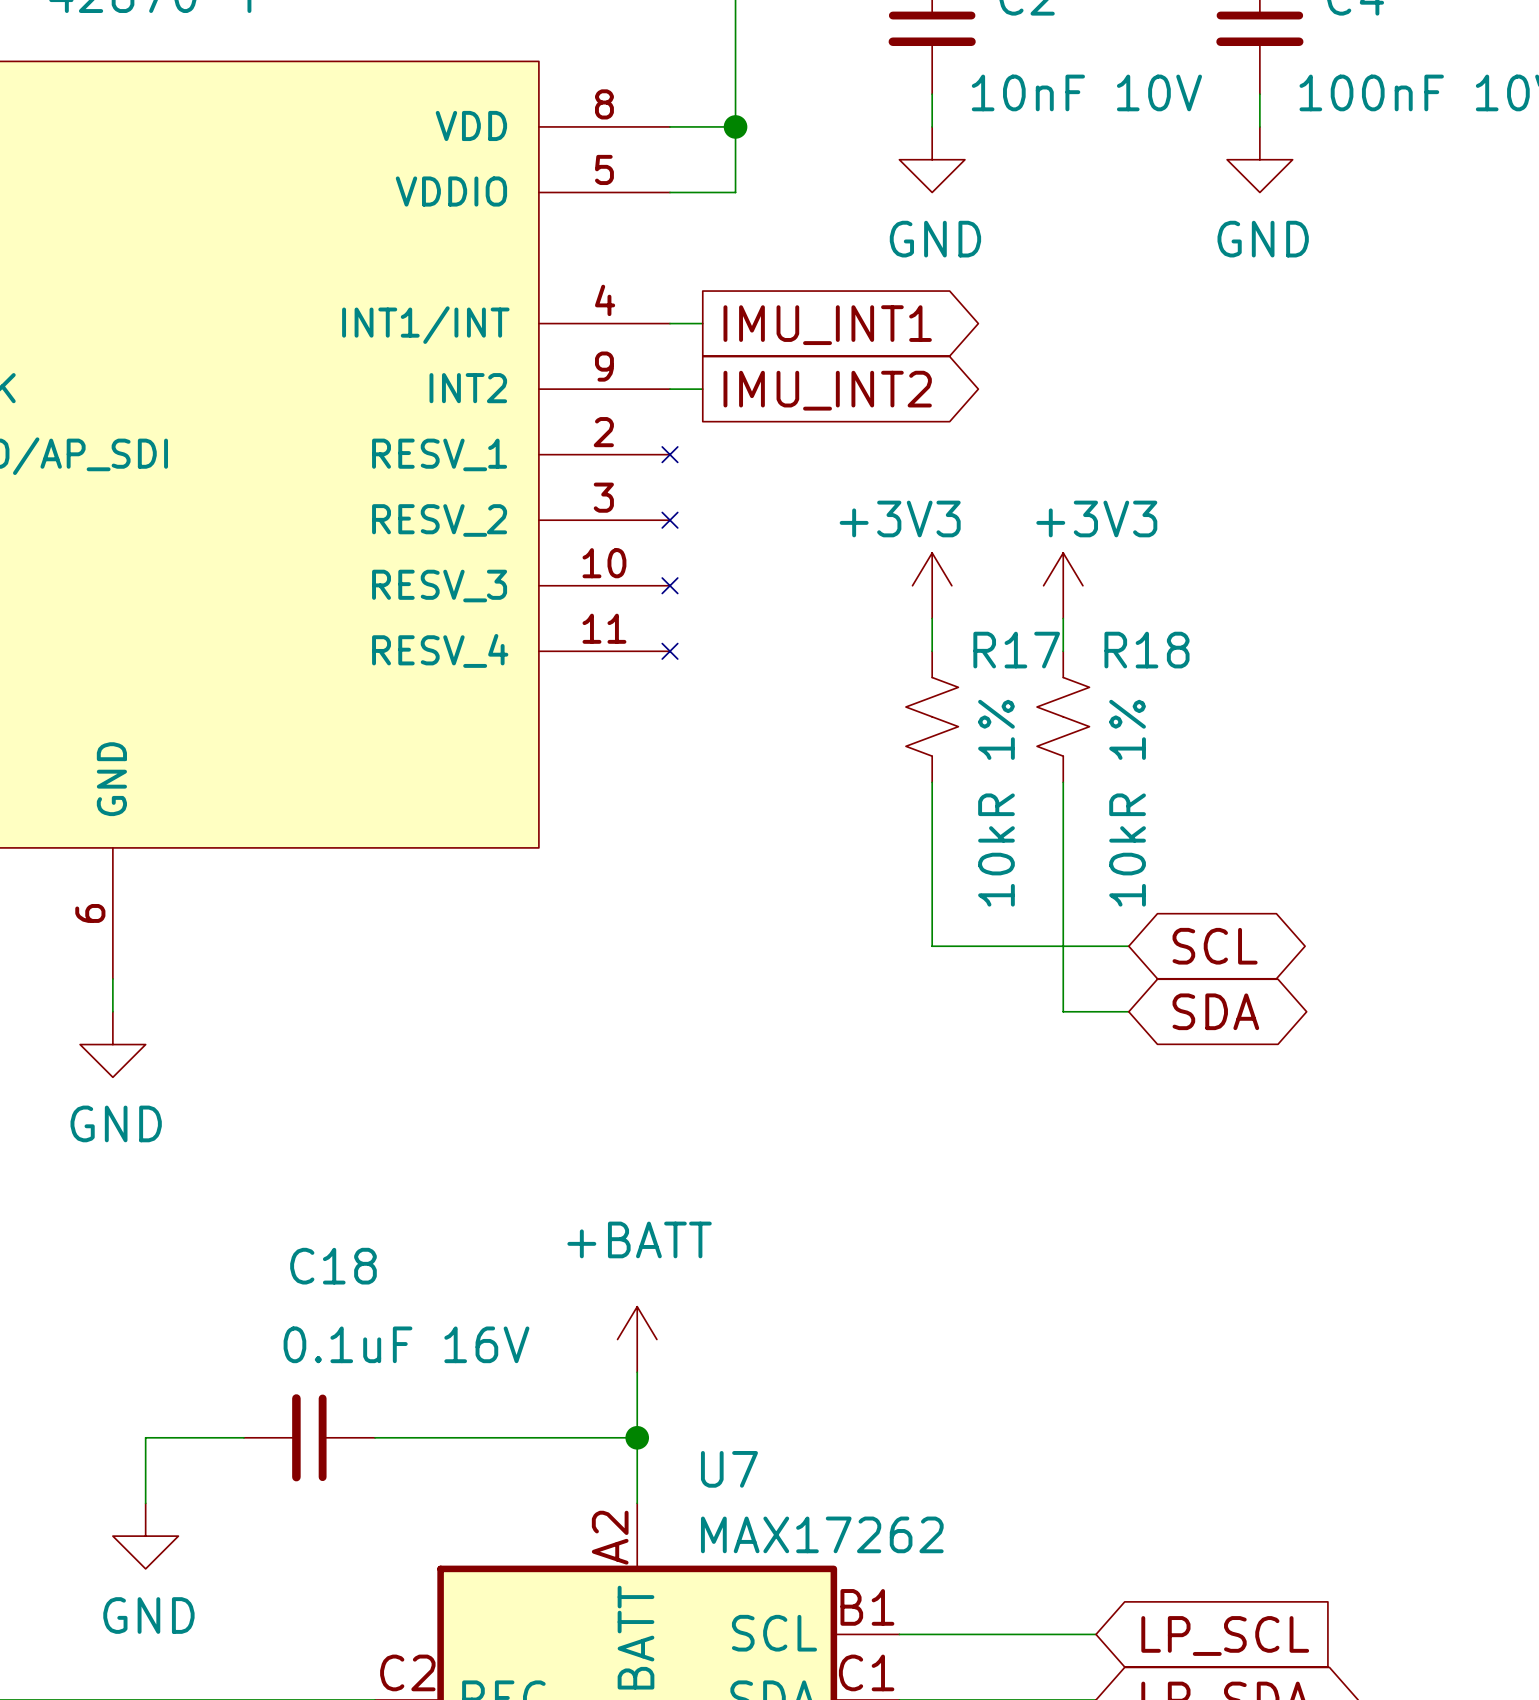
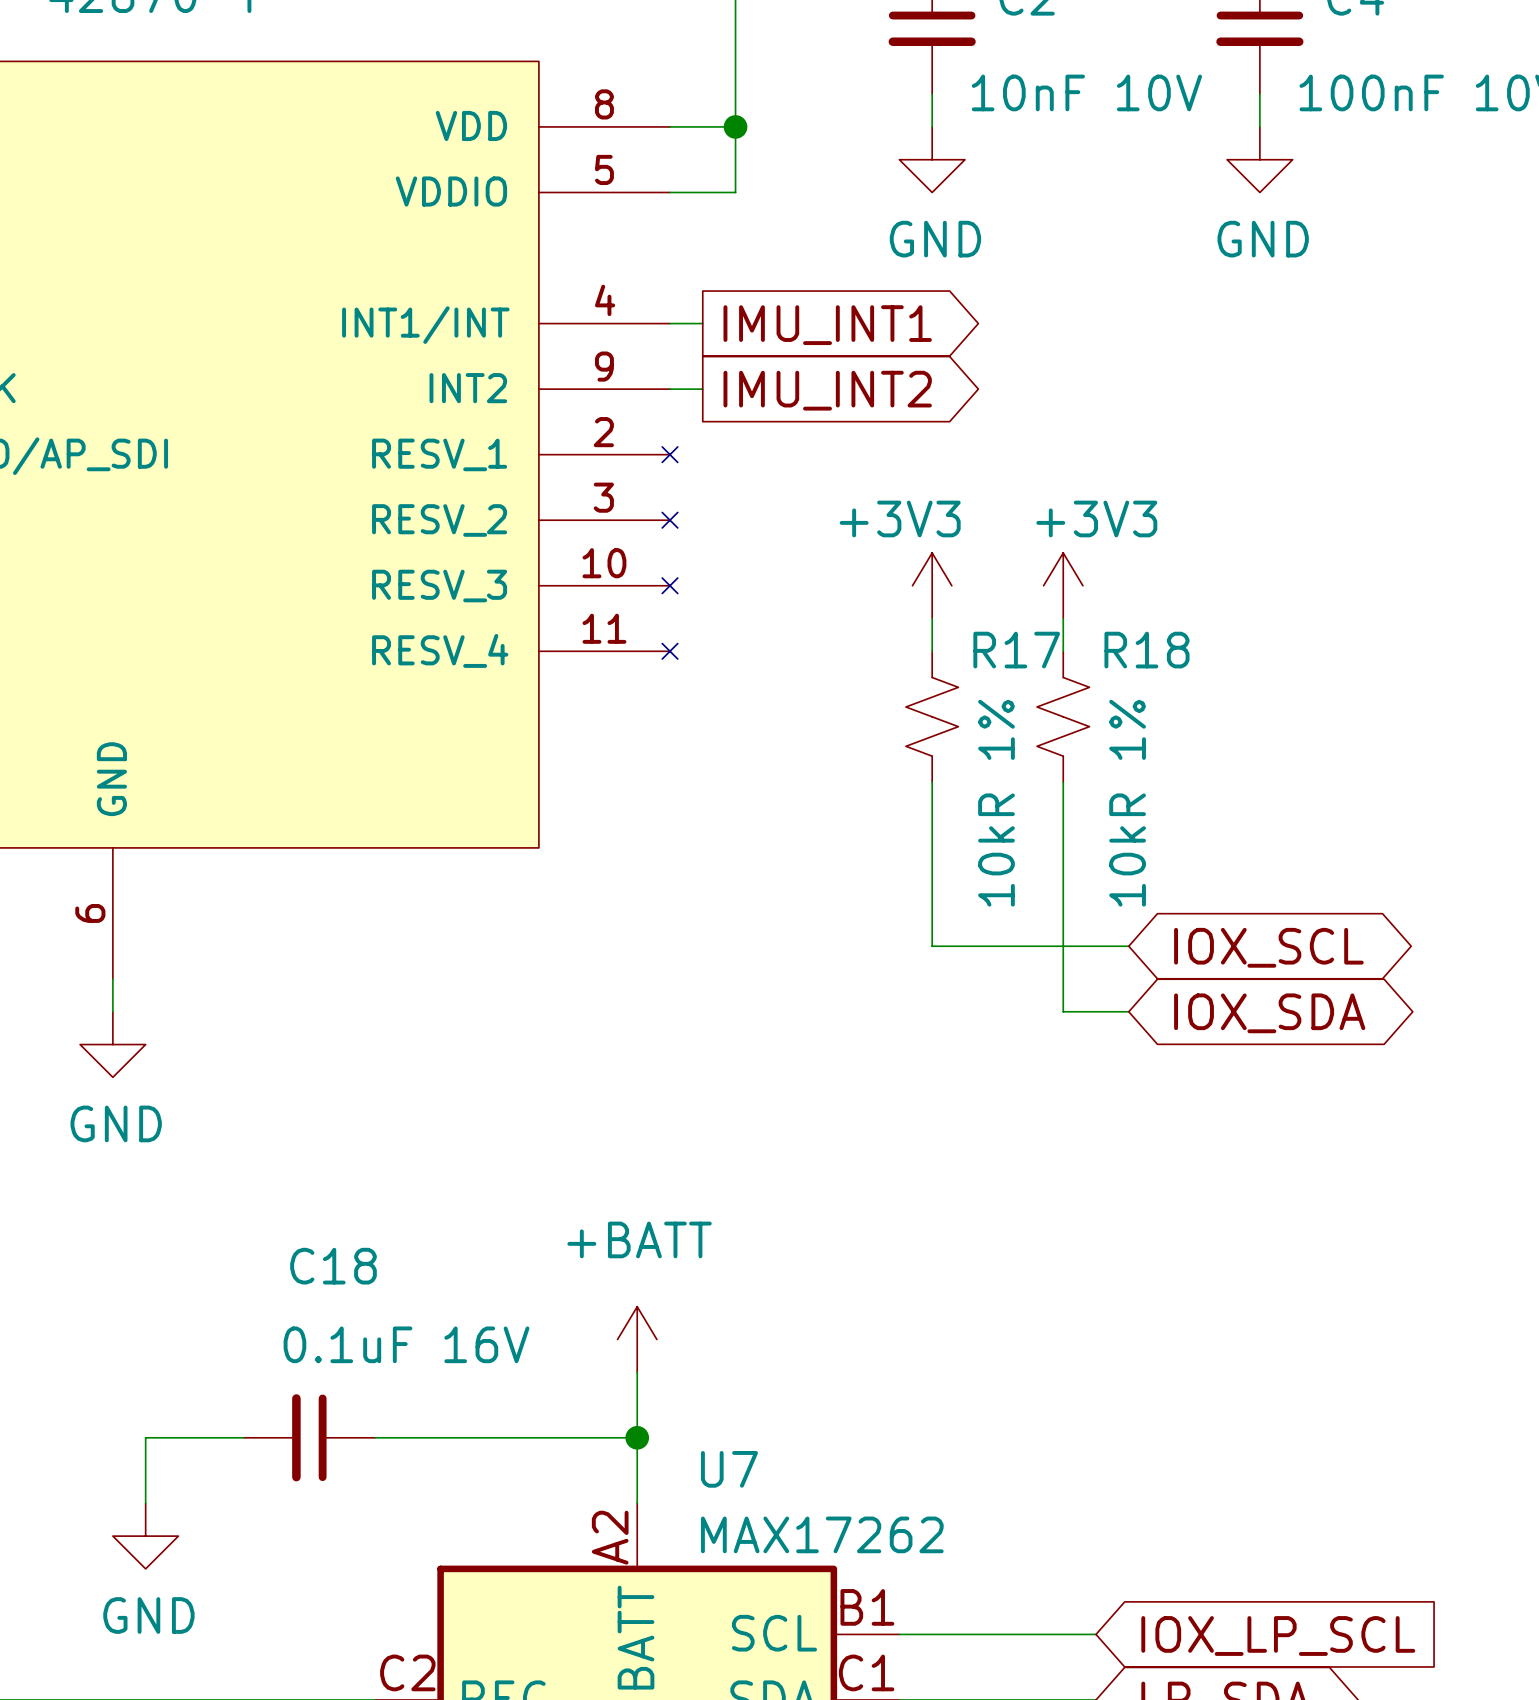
global label: SCL (1215, 946) -> IOX_SCL (1268, 947)
global label: SDA (1215, 1011) -> IOX_SDA (1269, 1013)
global label: LP_SCL (1225, 1635) -> IOX_LP_SCL (1278, 1635)

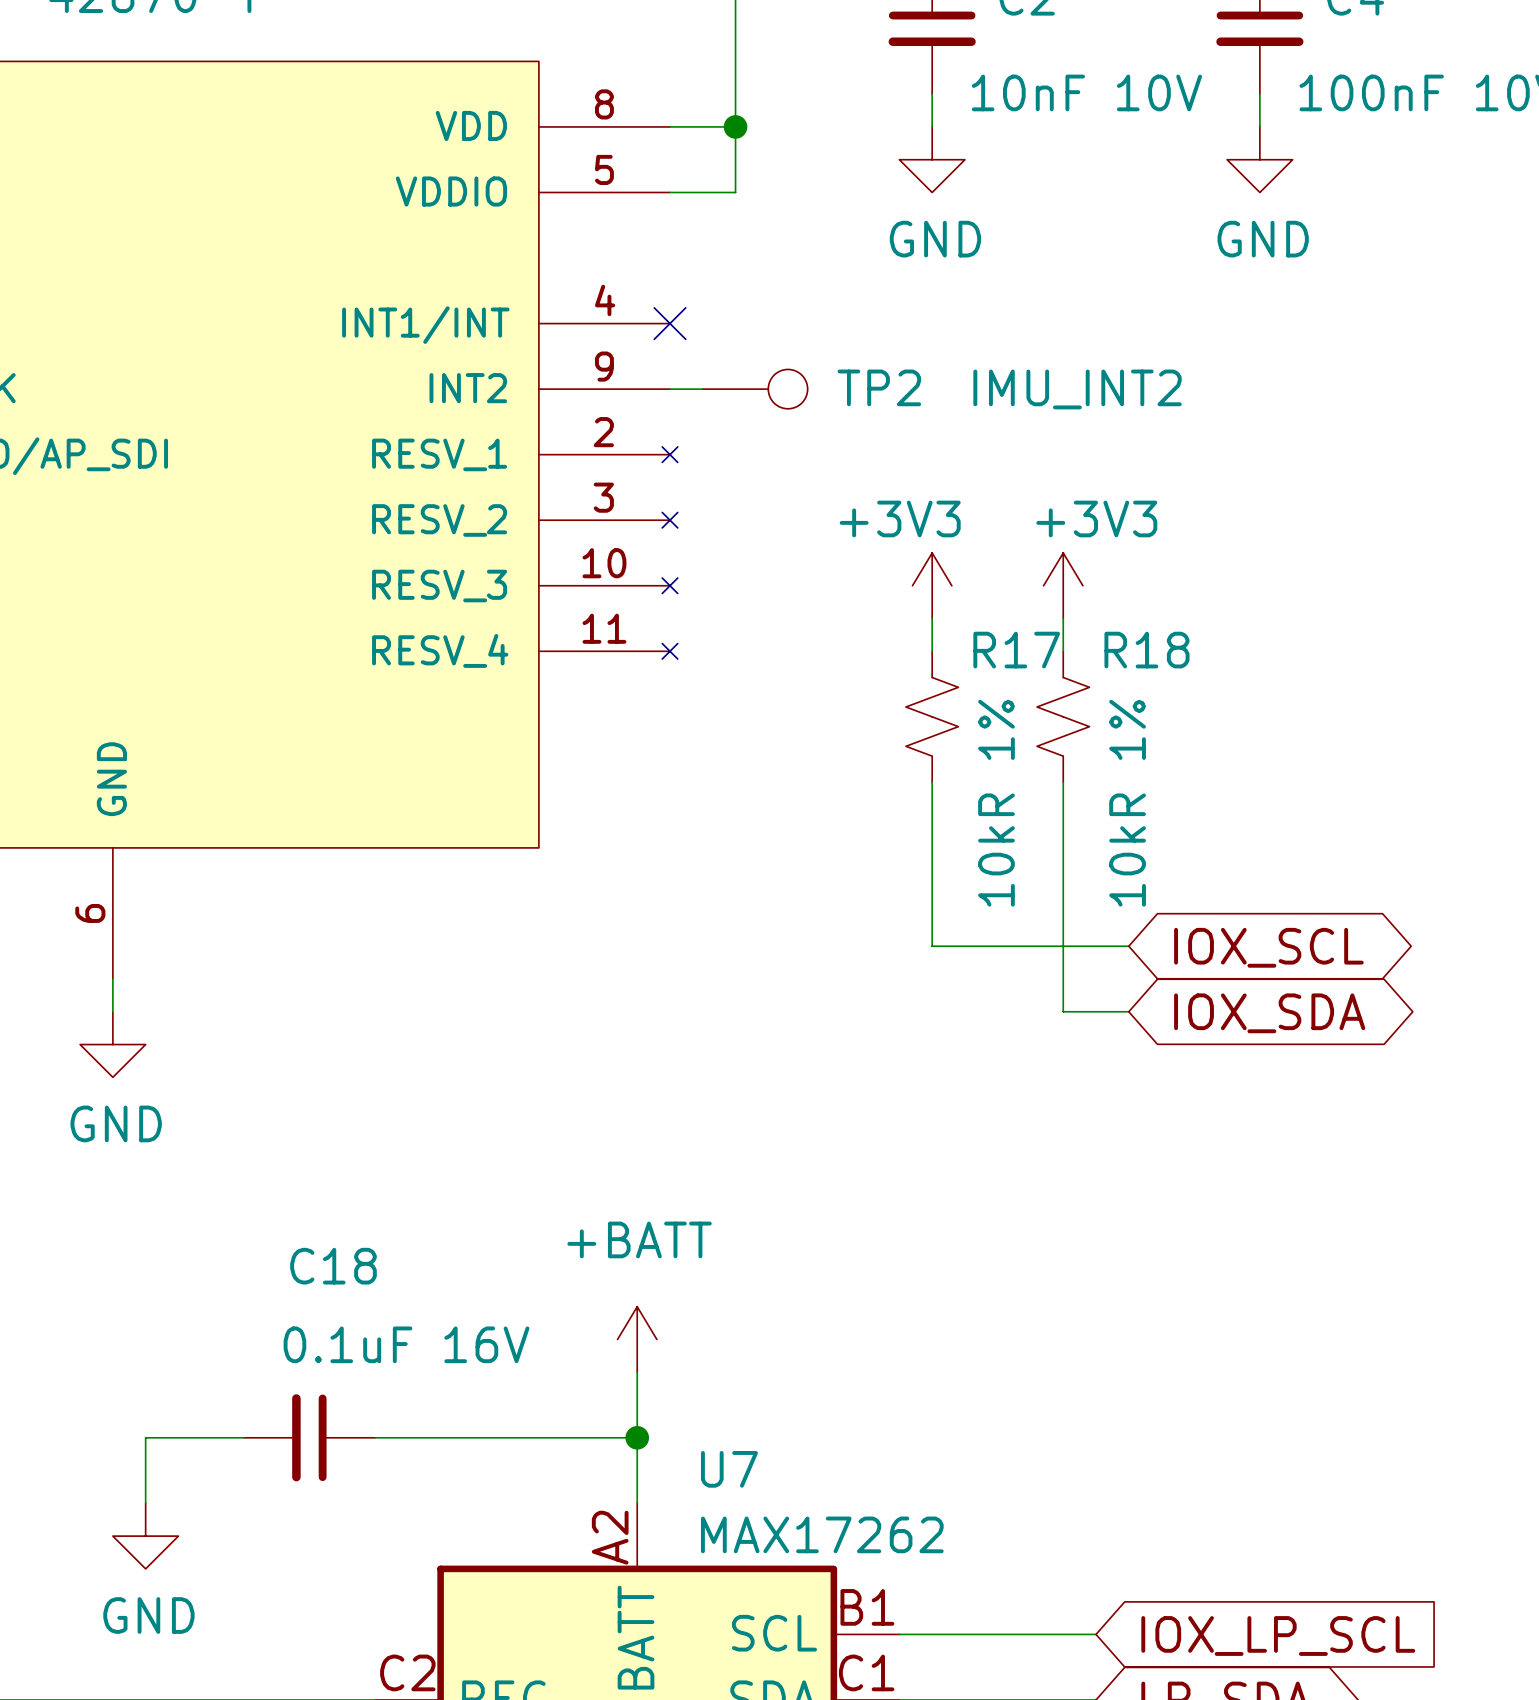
wire: (670, 323) (702, 323) -> none
no-connect mark: none -> (670, 323)
global label: IMU_INT1 (827, 325) -> none
TP2: none -> IMU_INT2 (755, 389)
global label: IMU_INT2 (827, 390) -> none

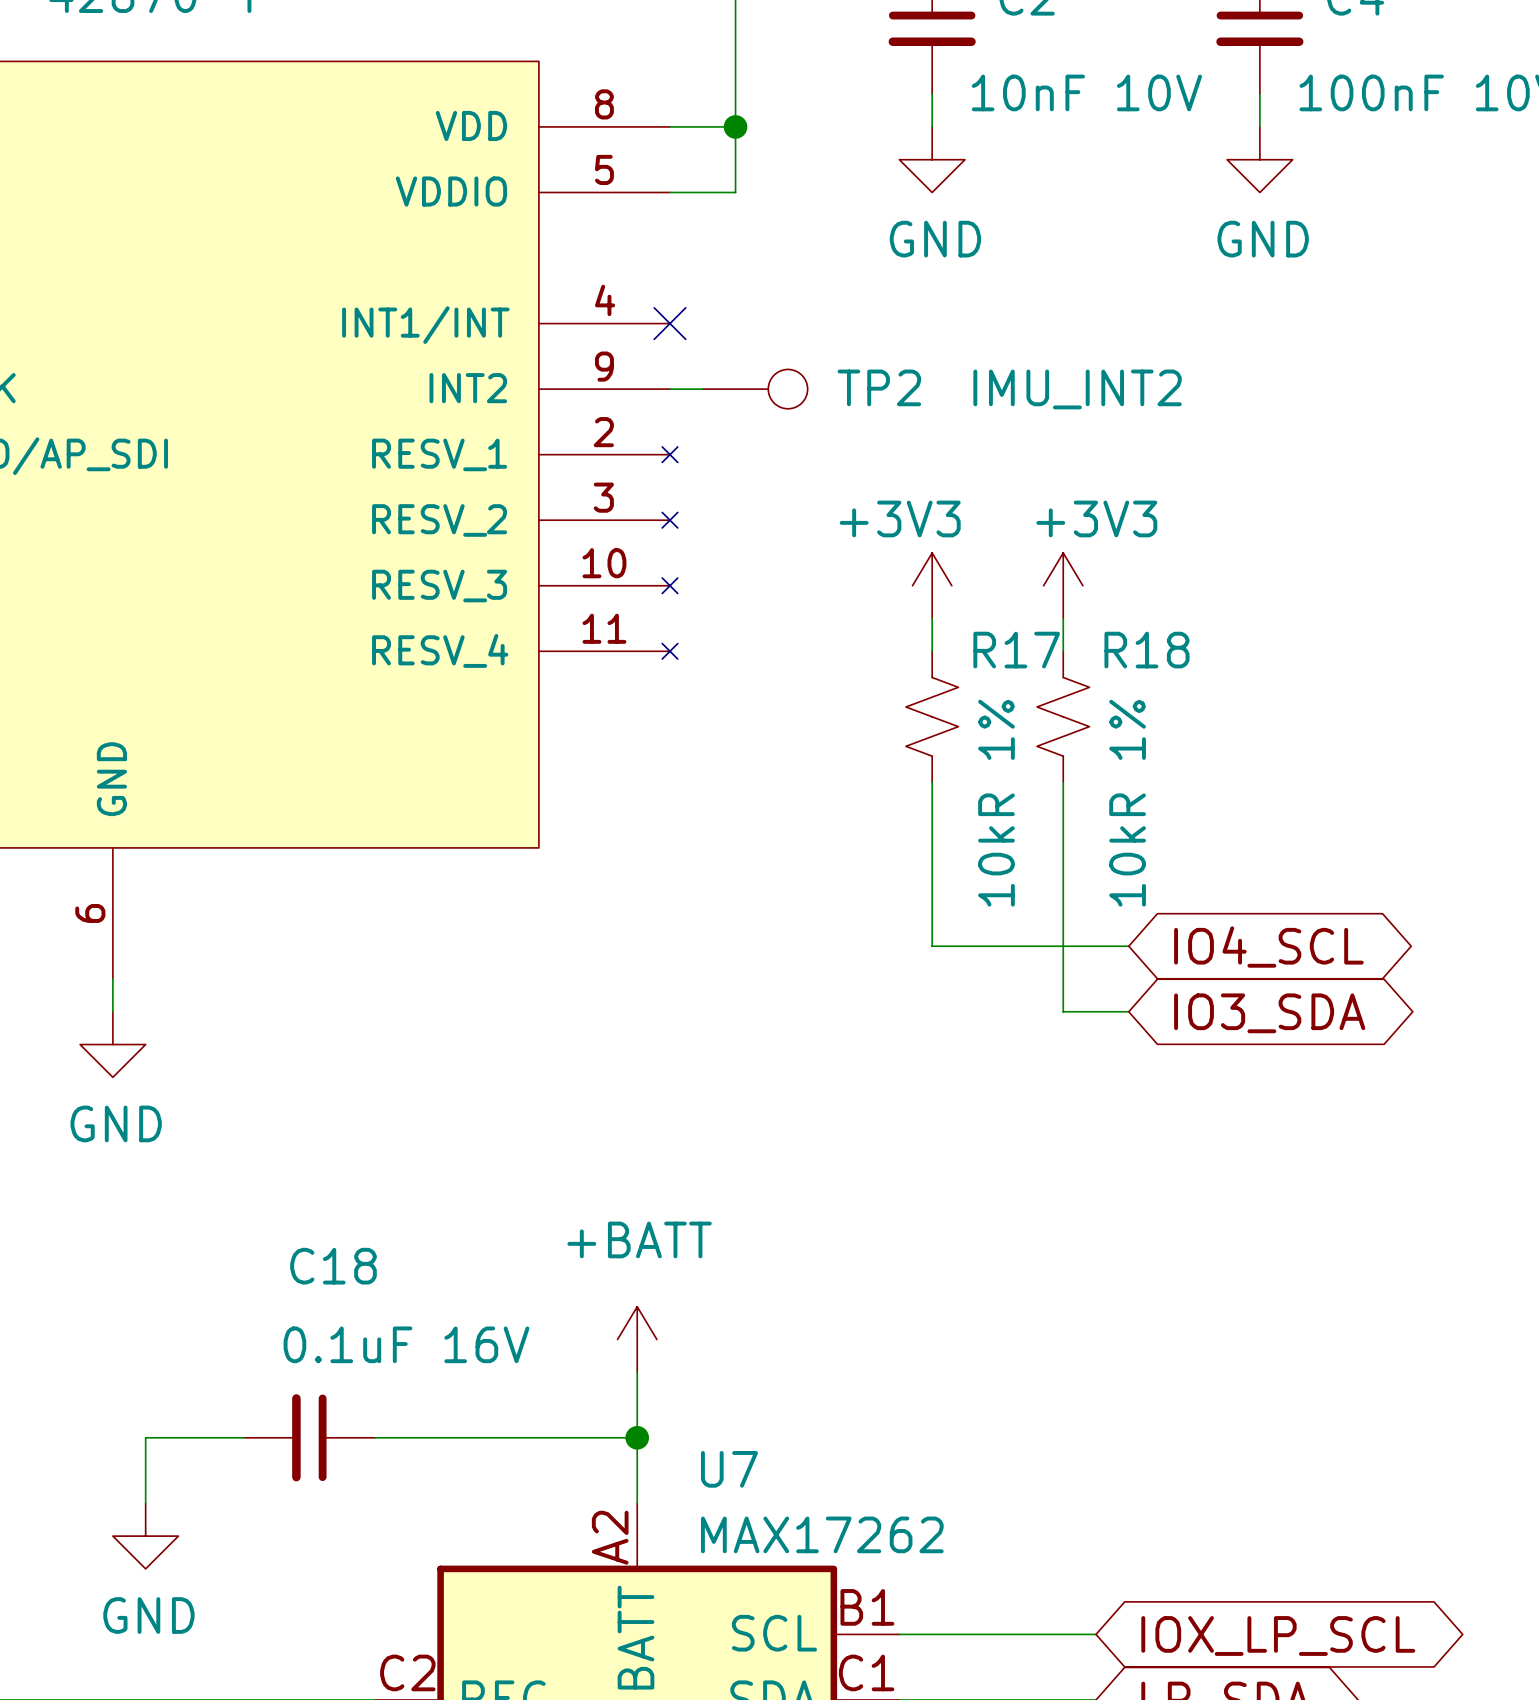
global label: IOX_SCL (1268, 947) -> IO4_SCL (1268, 947)
global label: IOX_SDA (1269, 1013) -> IO3_SDA (1269, 1013)
global label shape: input (1278, 1635) -> bidirectional (1278, 1635)

